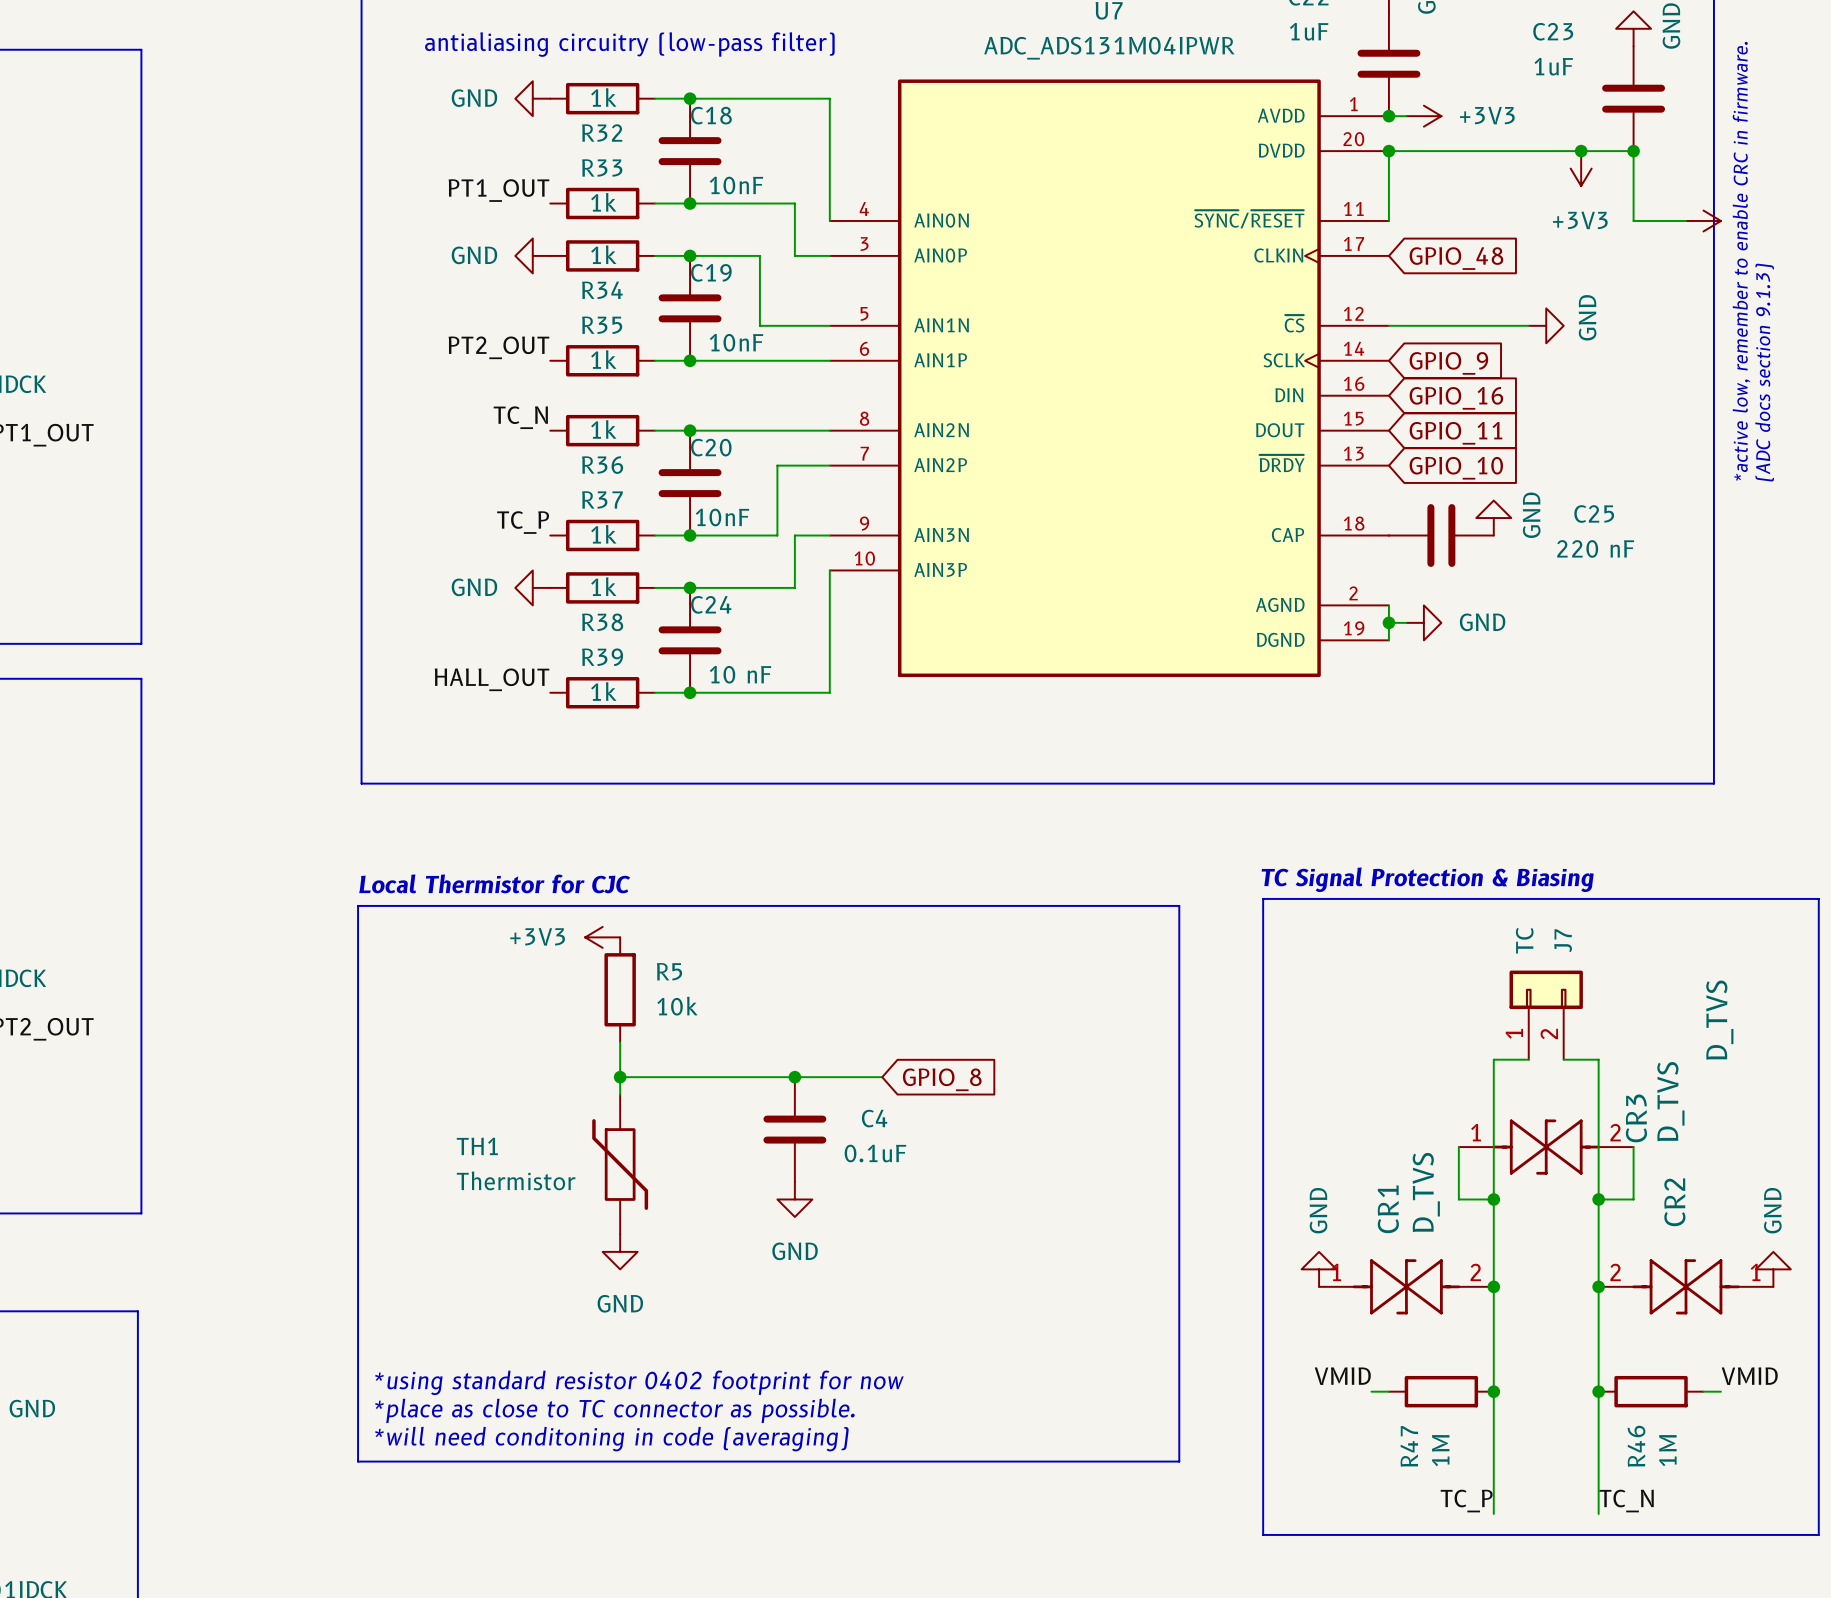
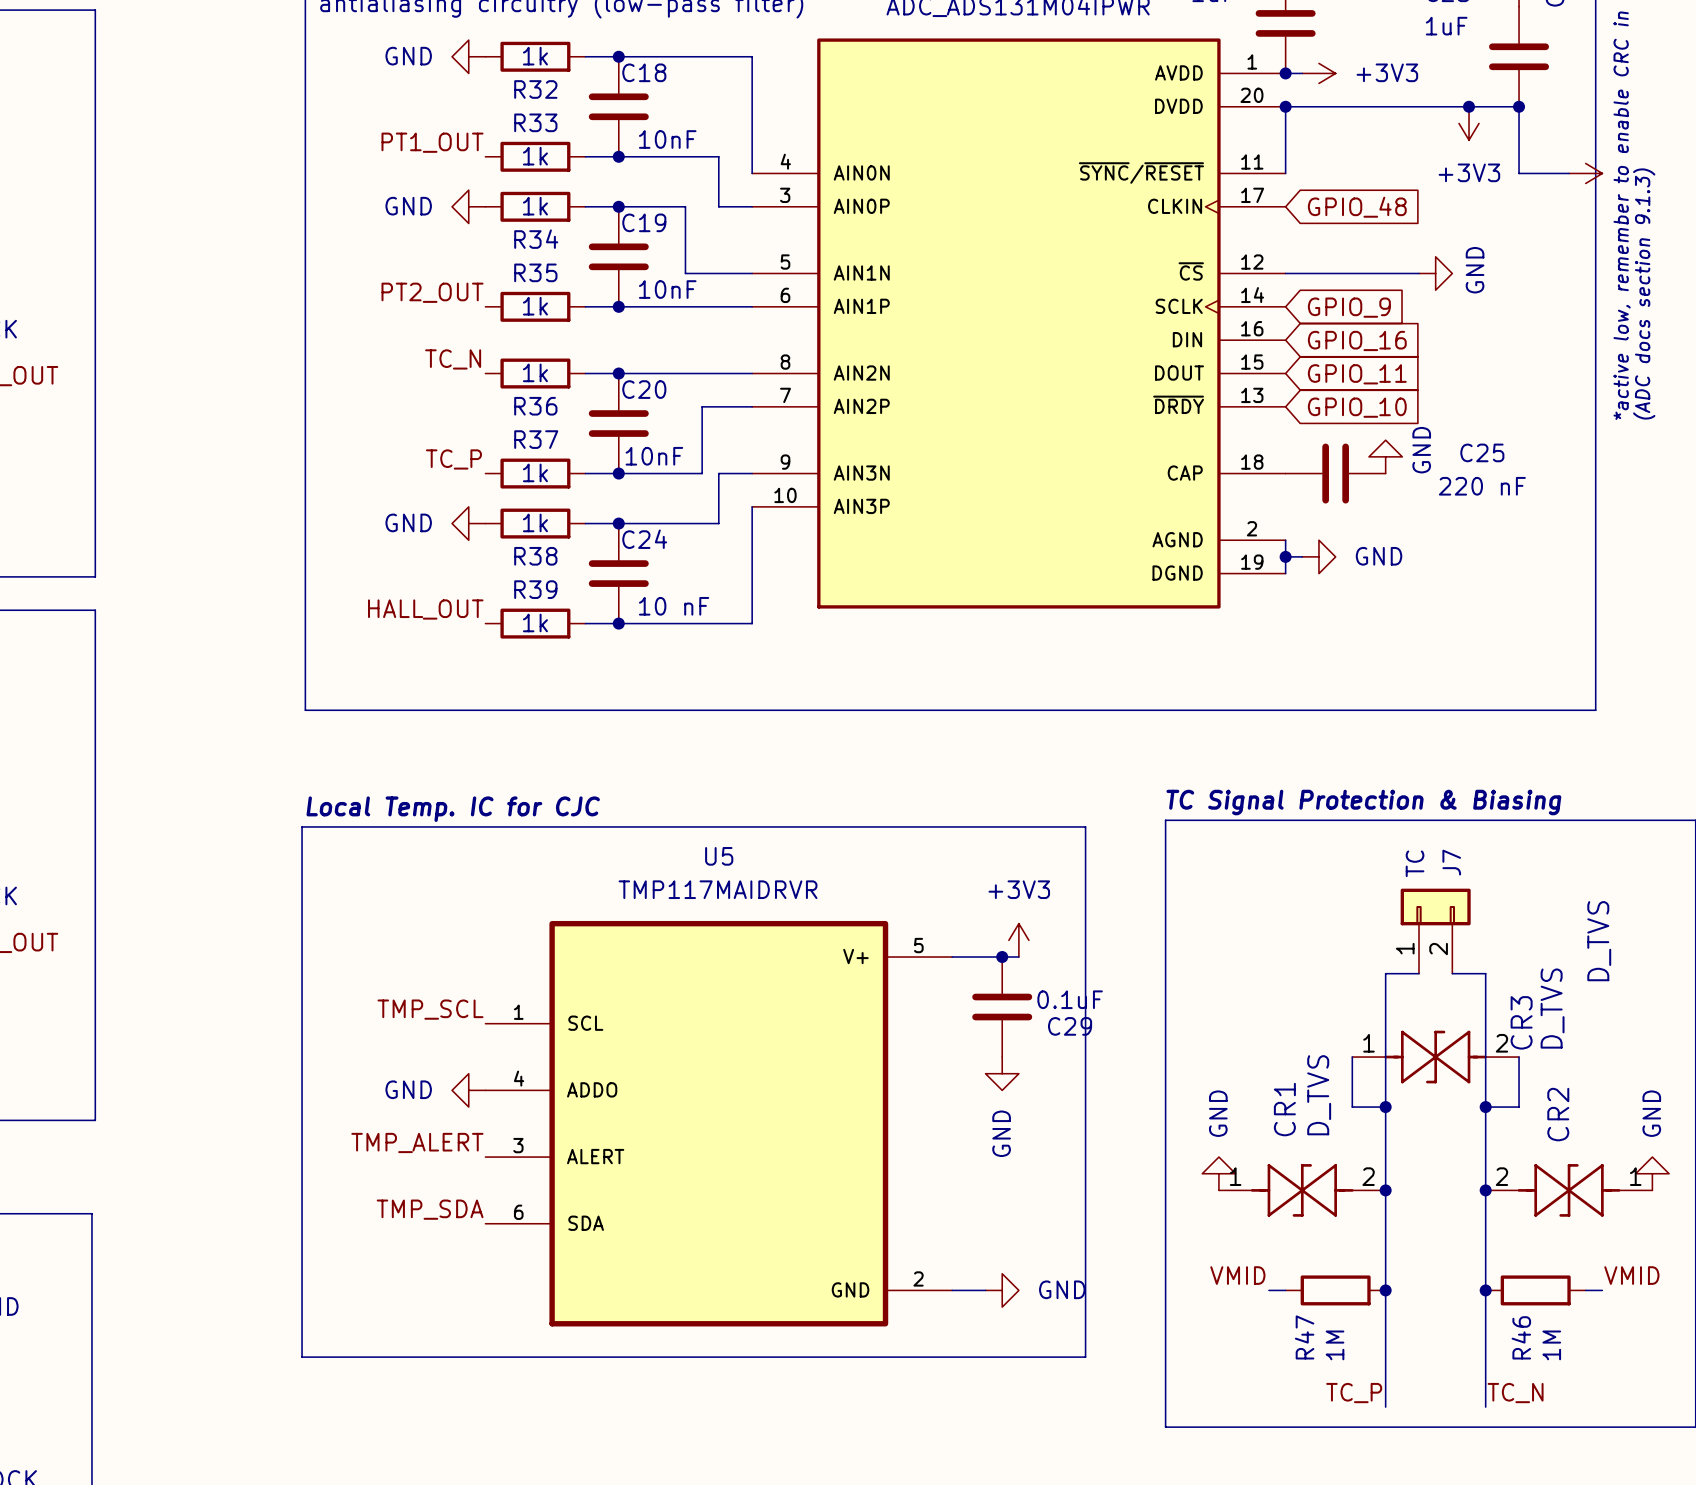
text: Local Thermistor for CJC (494, 883) -> Local Temp. IC for CJC (453, 809)
power symbol: +3V3 (602, 937) -> none
R5: 10k (620, 989) -> none
power symbol: none -> +3V3 (1018, 940)
wire: none -> (952, 957) (1018, 957)
junction: none -> (1002, 957)
junction: (620, 1077) -> none
junction: (794, 1077) -> none
global label: GPIO_8 (942, 1079) -> none
C29: none -> 0.1uF (1002, 1007)
label: none -> TMP_SCL (430, 1009)
C4: 0.1uF (794, 1129) -> none
TH1: Thermistor (620, 1164) -> none
power symbol: none -> GND (1002, 1073)
power symbol: GND (794, 1199) -> none
U5: none -> TMP117MAIDRVR (718, 1123)
label: none -> TMP_ALERT (417, 1142)
power symbol rotation: 0° (620, 1251) -> 90° clockwise (468, 1090)
power symbol position: GND (620, 1251) -> GND (468, 1090)
label: none -> TMP_SDA (430, 1209)
text: *using standard resistor 0402 footprint for now (639, 1382) -> none
wire: none -> (952, 1290) (985, 1290)
power symbol: none -> GND (1002, 1290)
text: *place as close to TC connector as possible. (614, 1410) -> none
text: *will need conditoning in code (averaging) (611, 1439) -> none

